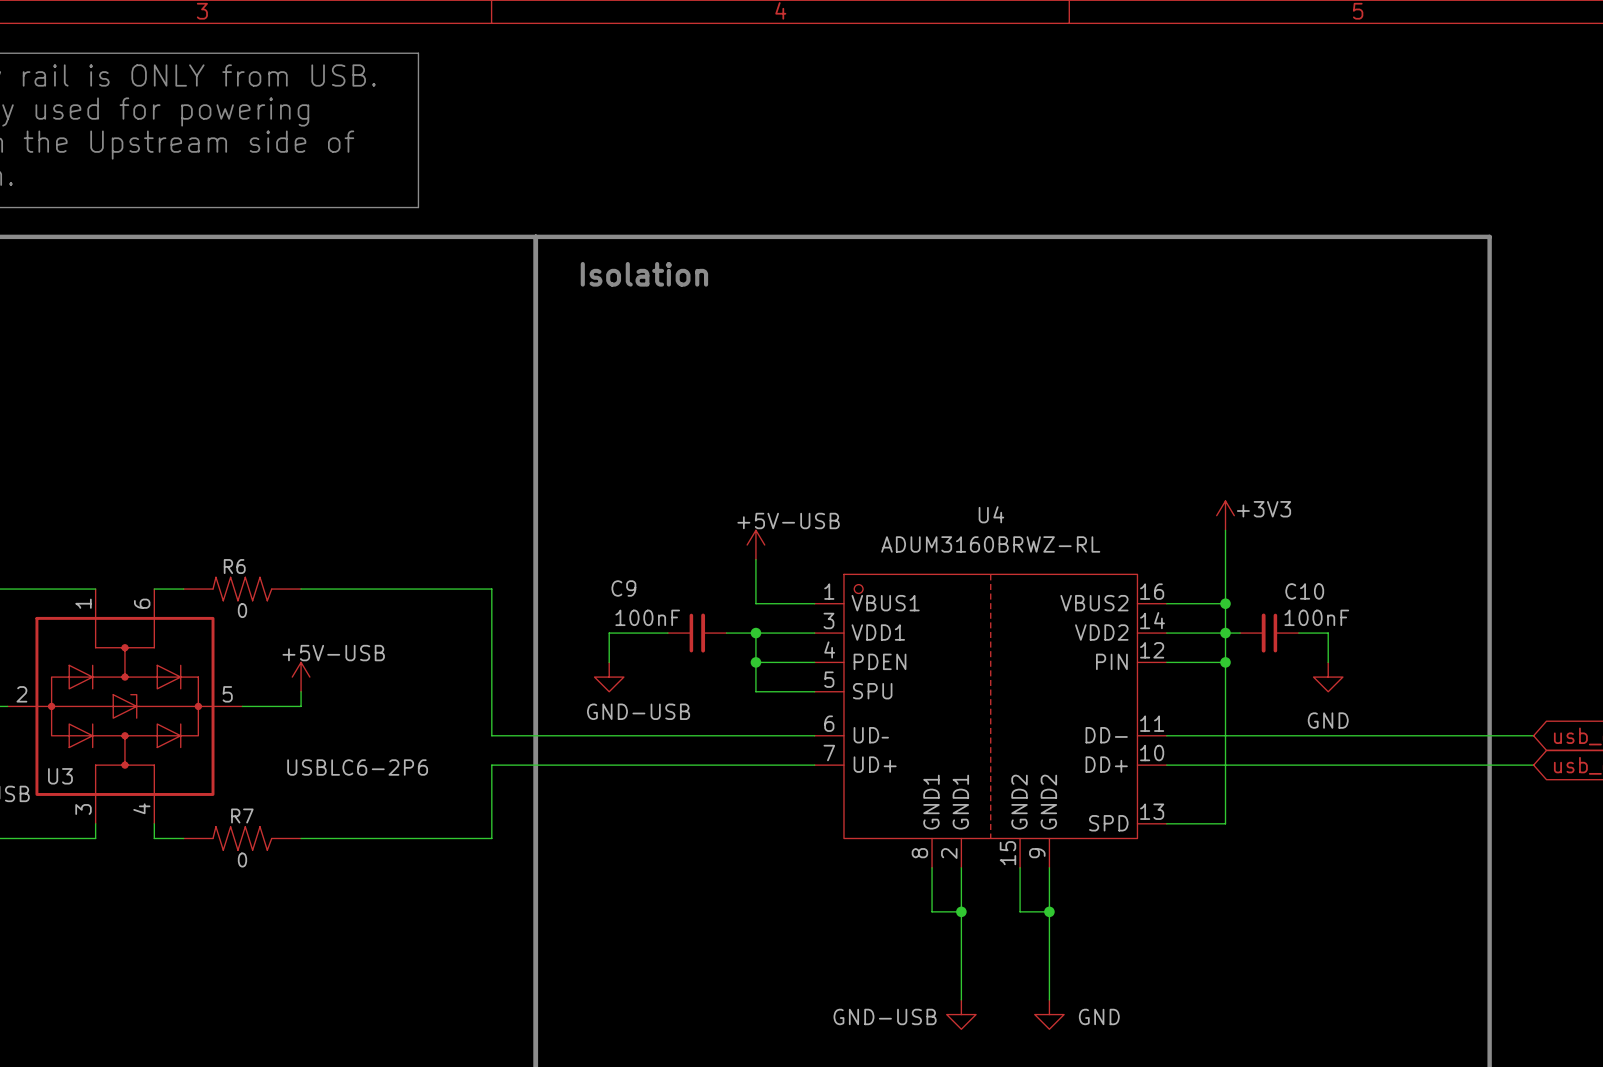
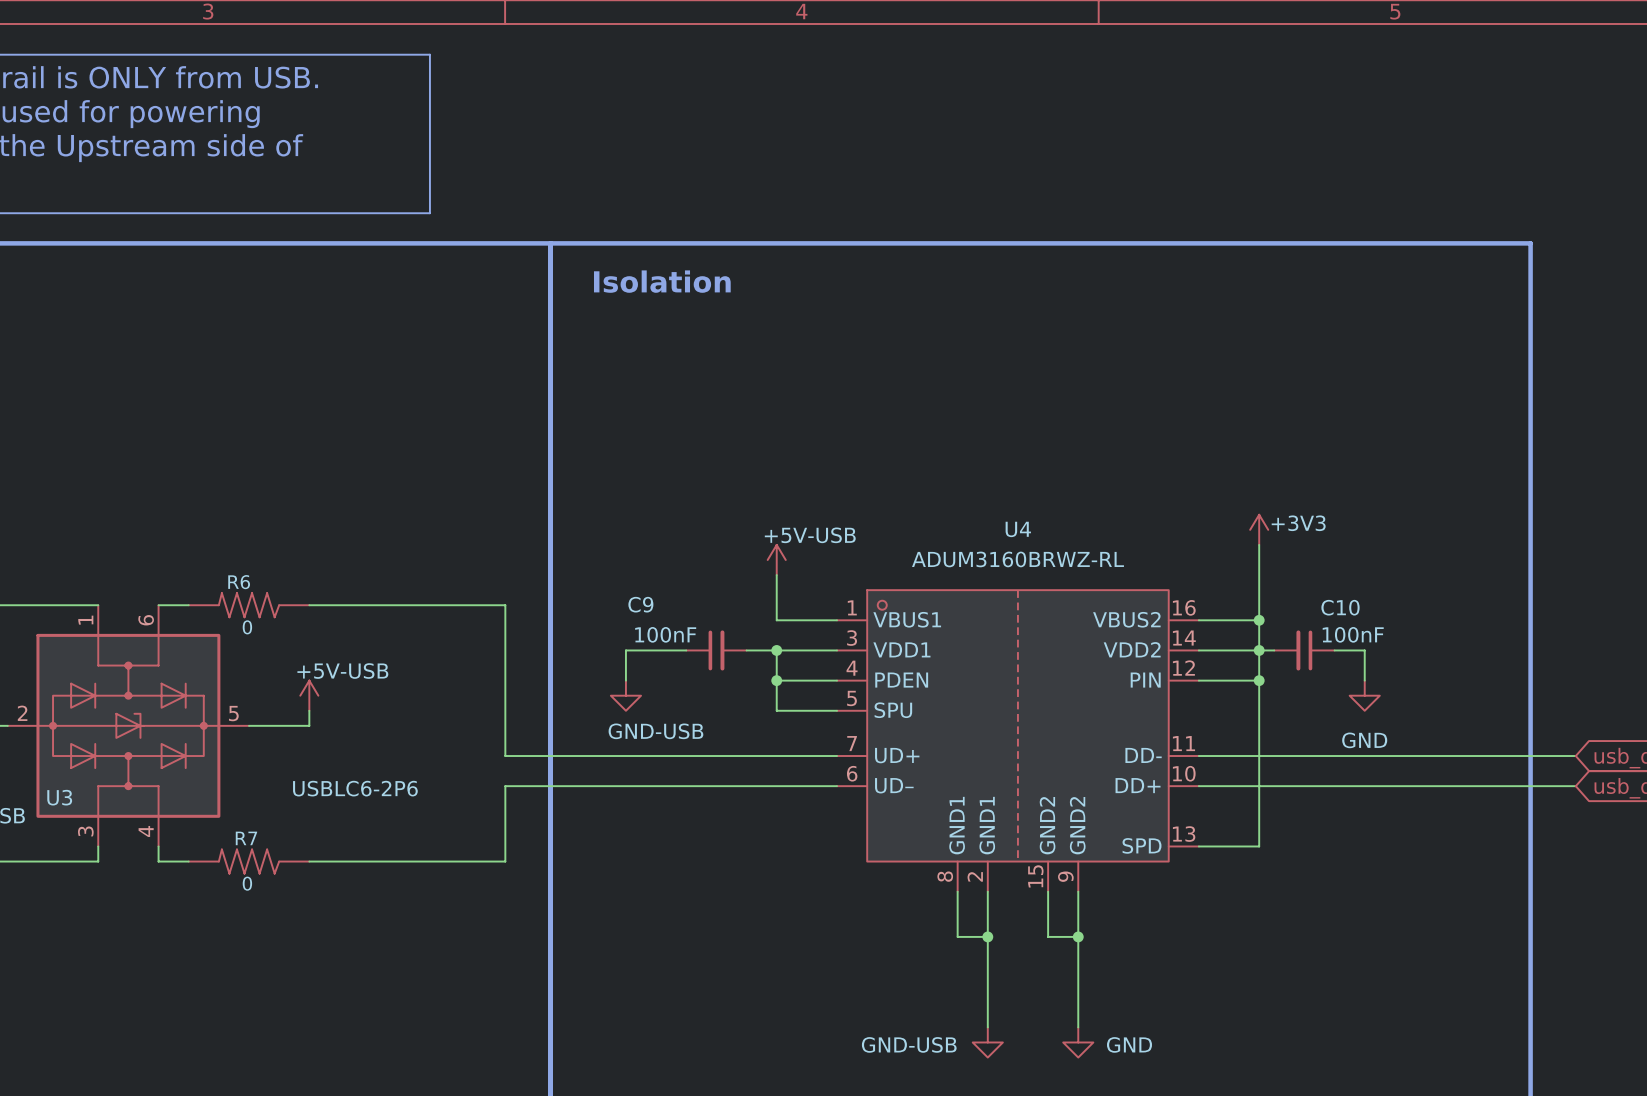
U4 pin number: 6 (829, 723) -> 7 (852, 743)
U4 pin name: UD– (871, 735) -> UD+ (897, 755)
U4 pin number: 7 (829, 753) -> 6 (852, 773)
U4 pin name: UD+ (875, 764) -> UD– (894, 785)

